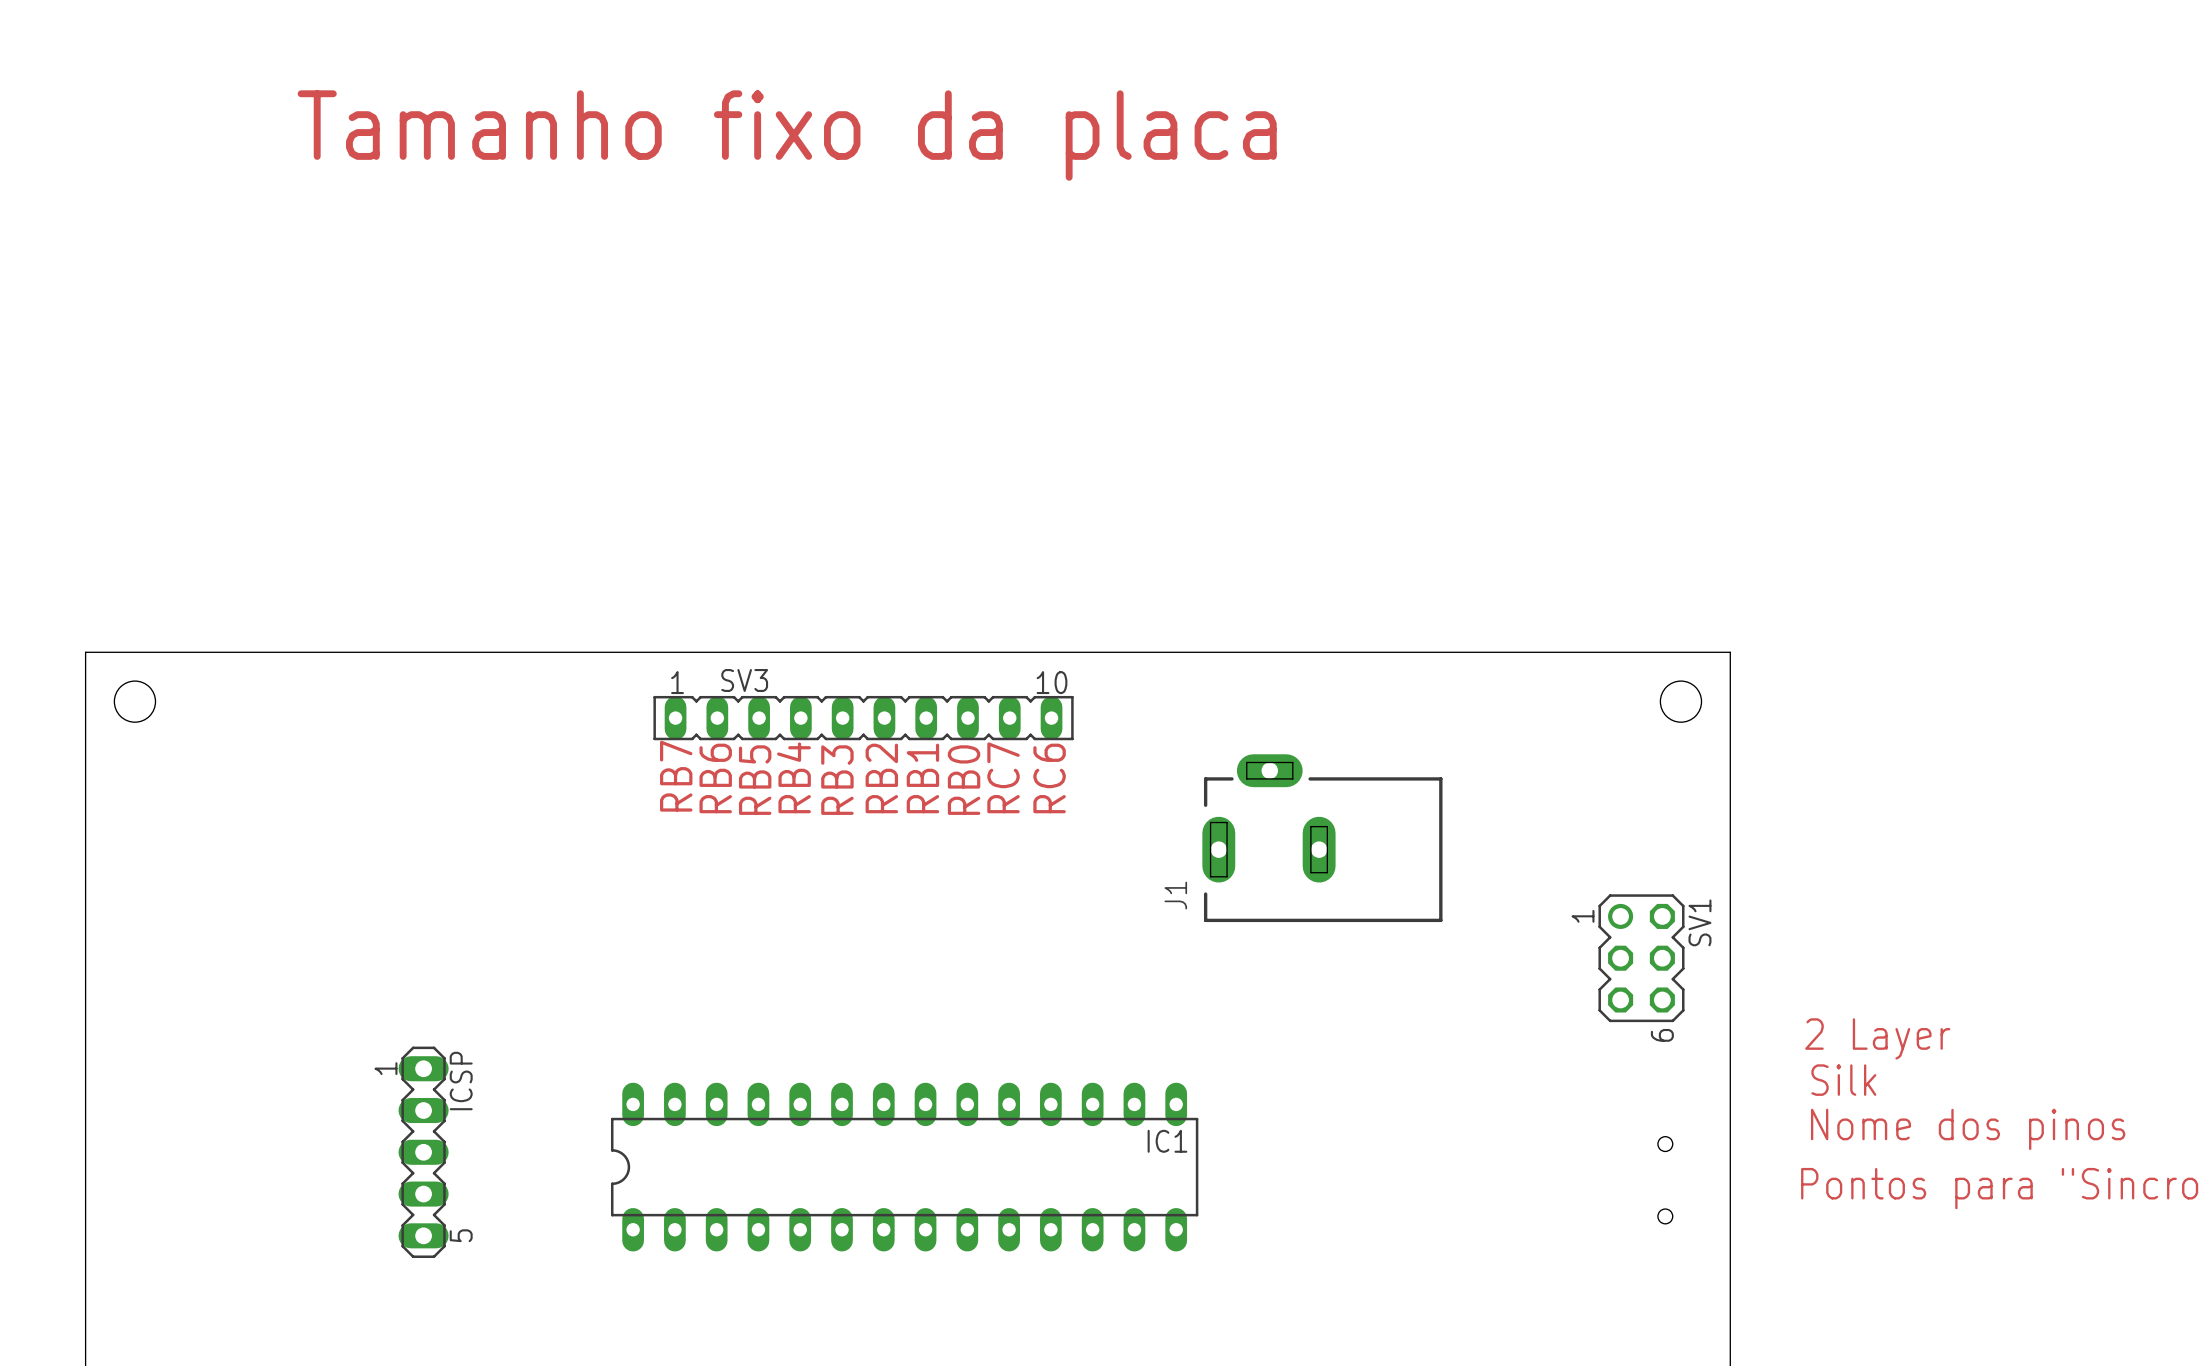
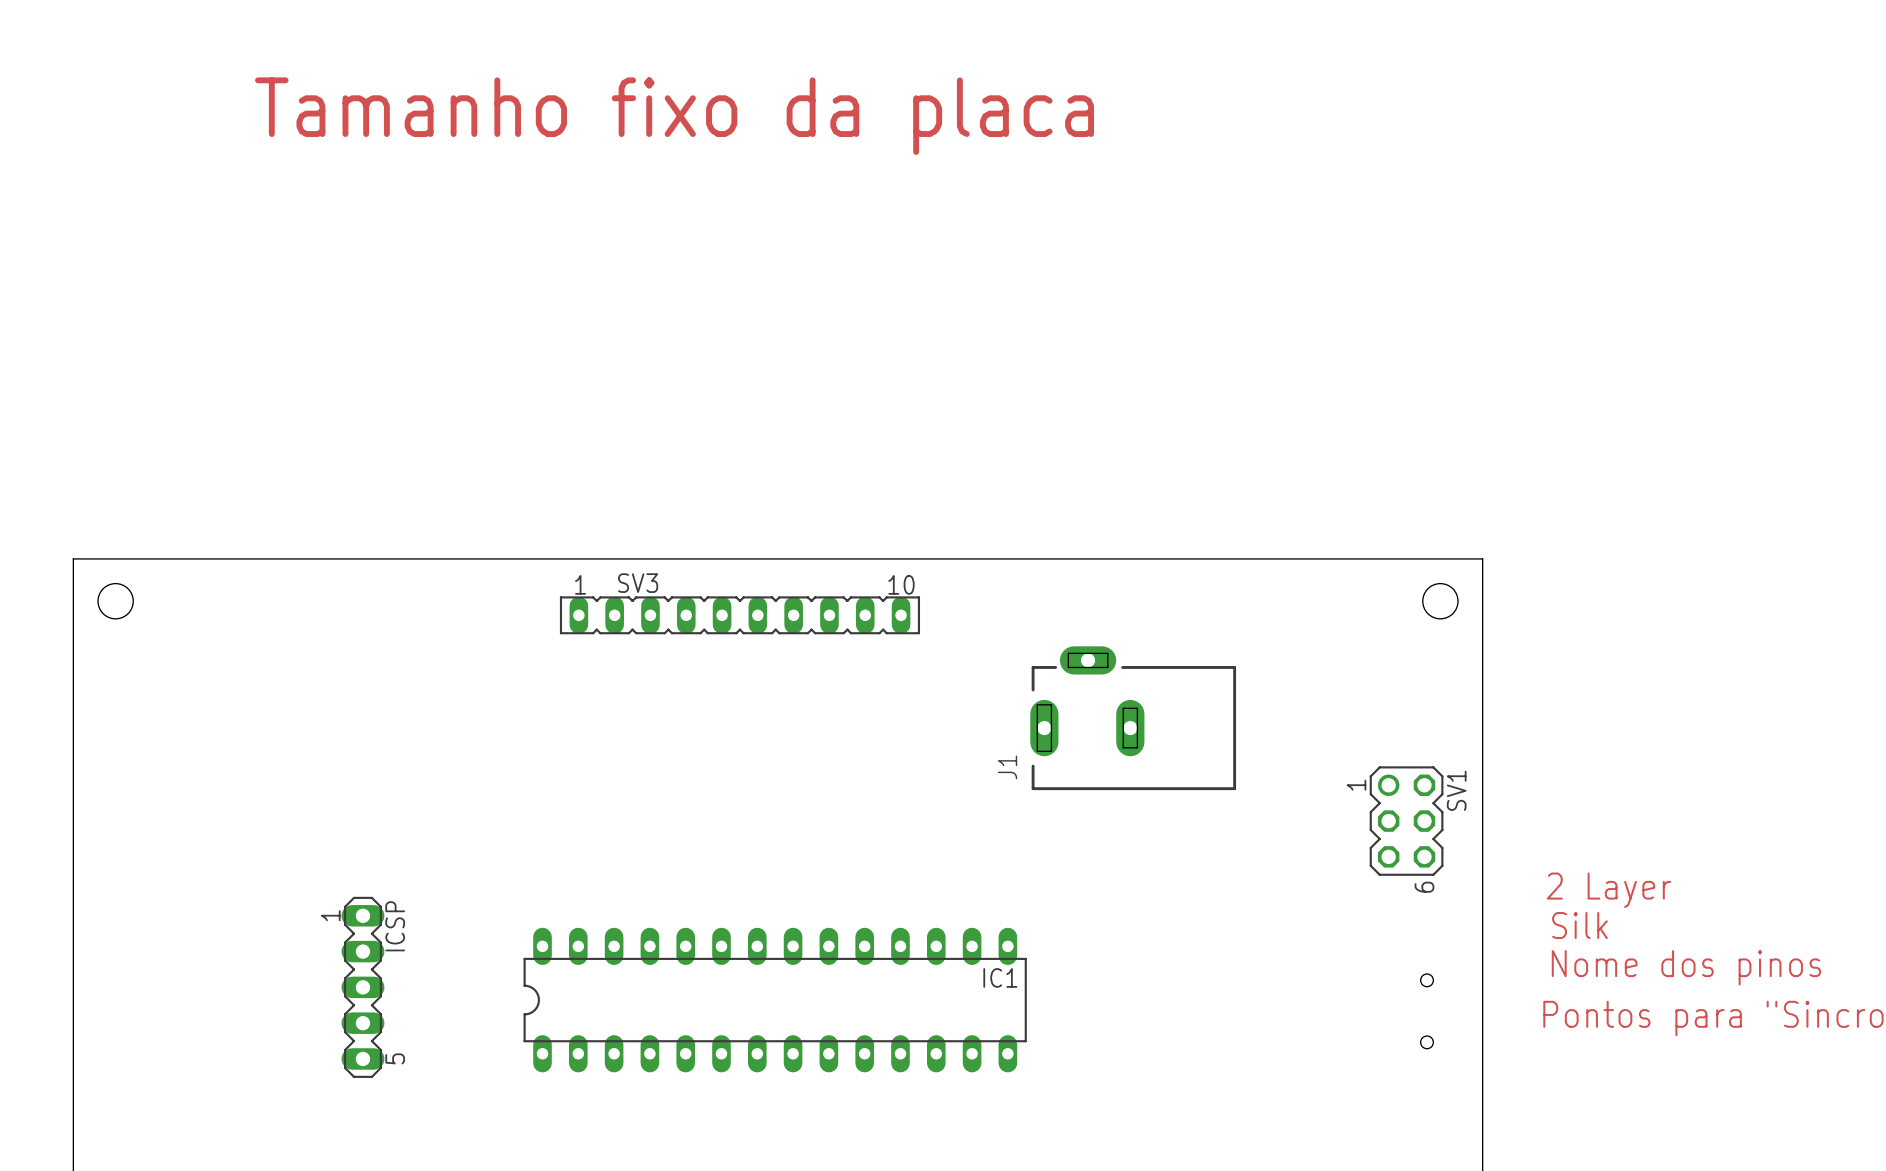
text: RB7 (676, 776) -> none
text: RB4 (793, 777) -> none
text: RC7 (1003, 777) -> none
text: RB6 (715, 778) -> none
text: RB2 (881, 778) -> none
text: RB1 (922, 778) -> none
text: RC6 (1049, 778) -> none
text: RB5 (755, 780) -> none
text: RB3 (837, 780) -> none
text: RB0 (964, 780) -> none

